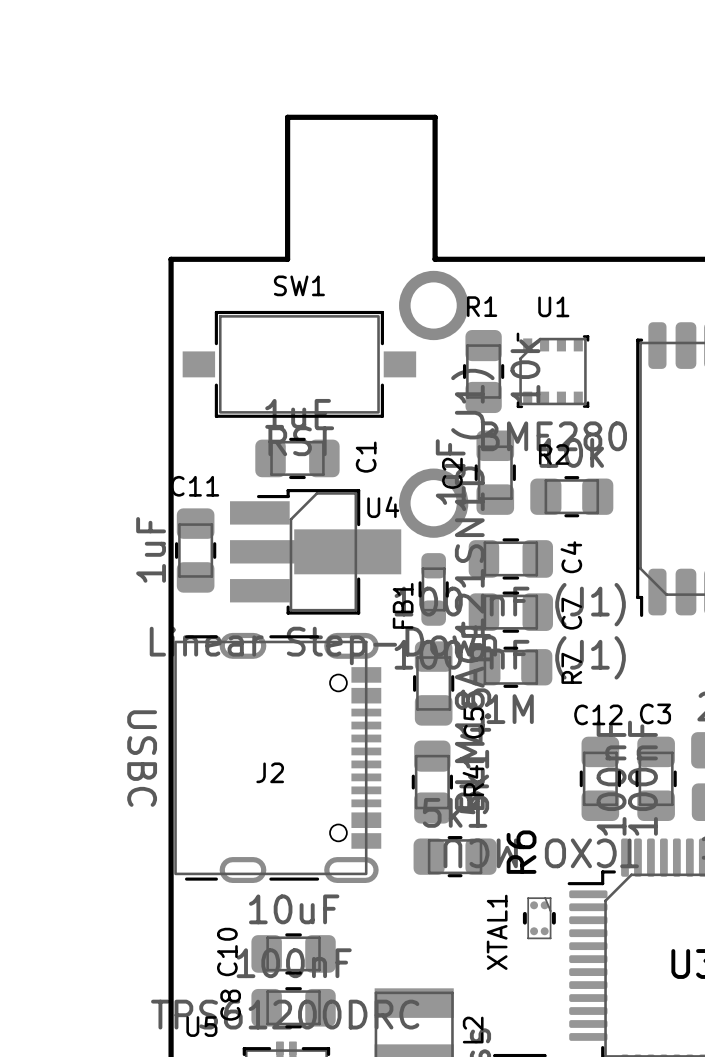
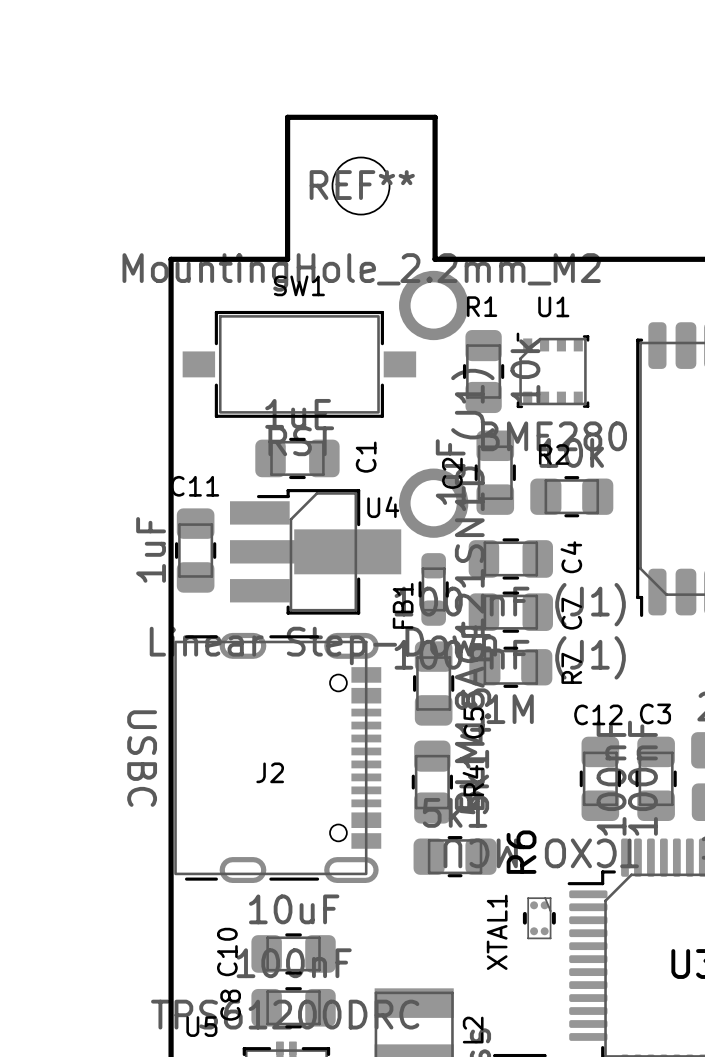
REF**: none -> MountingHole_2.2mm_M2 (361, 186)

